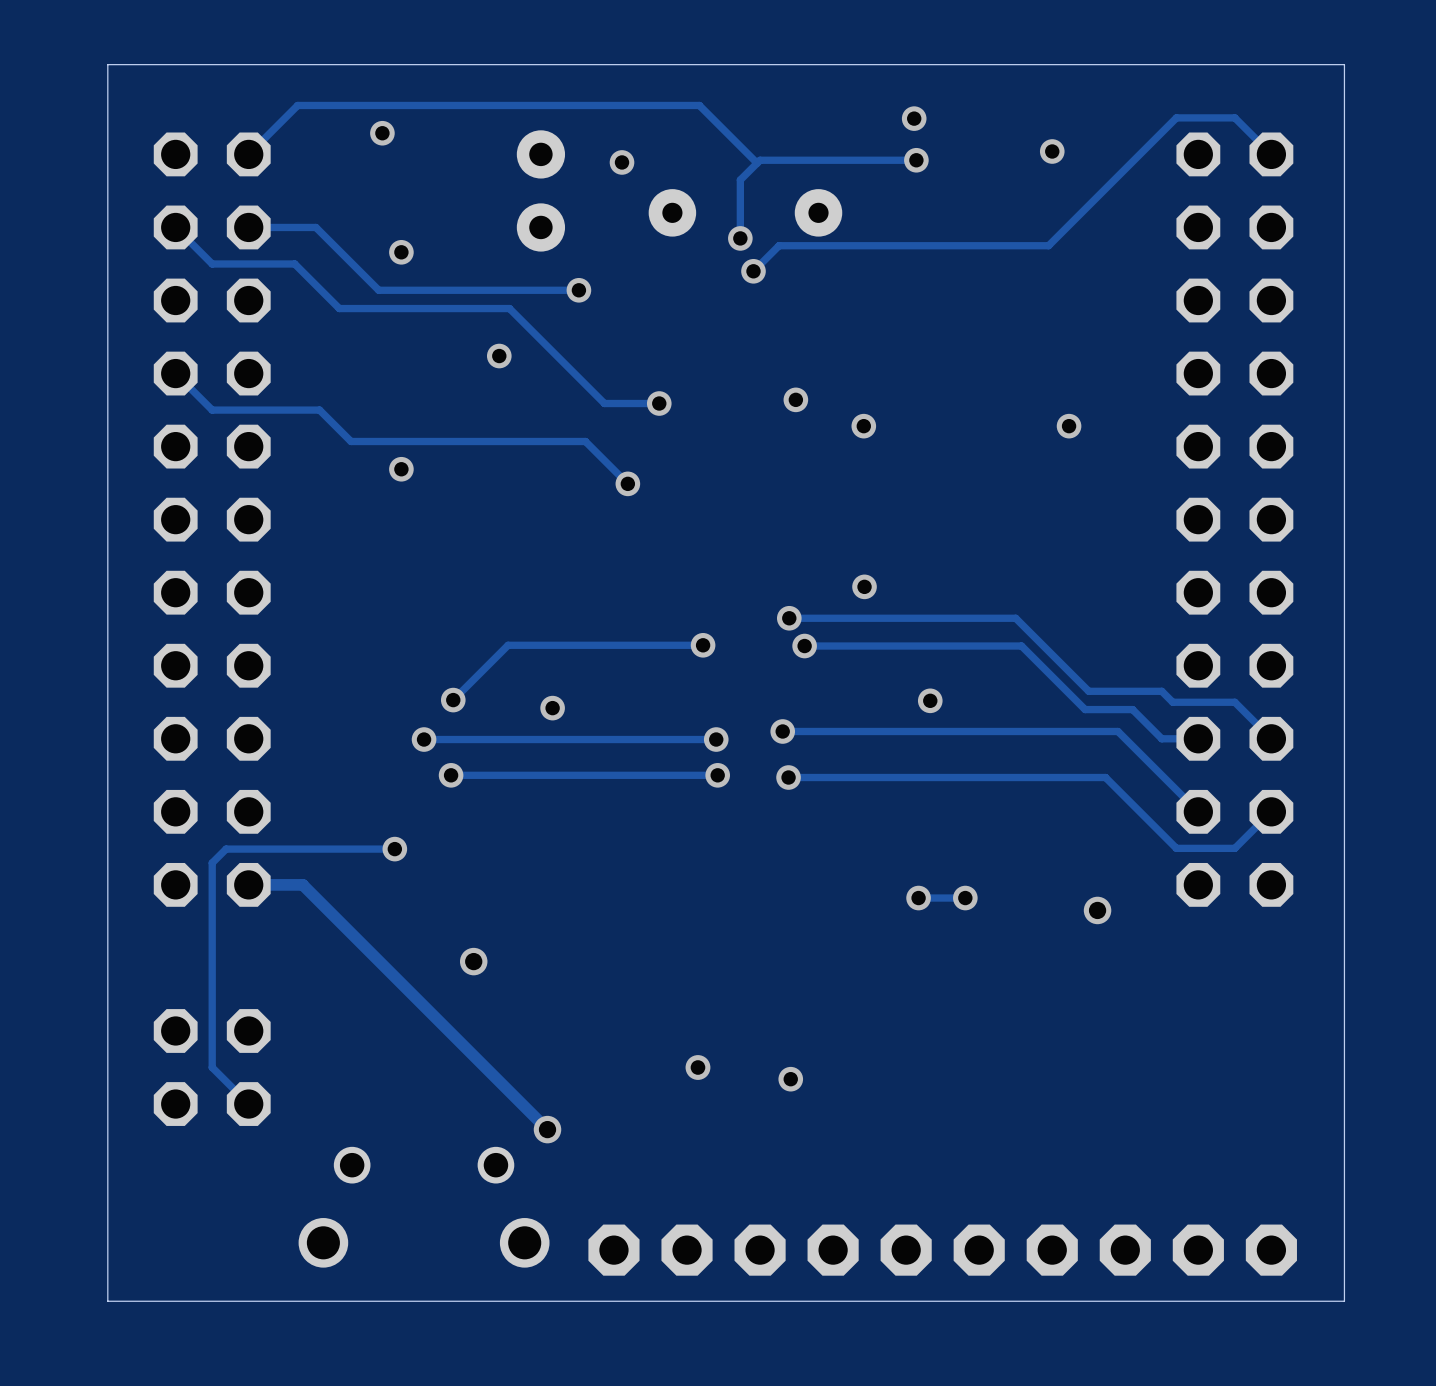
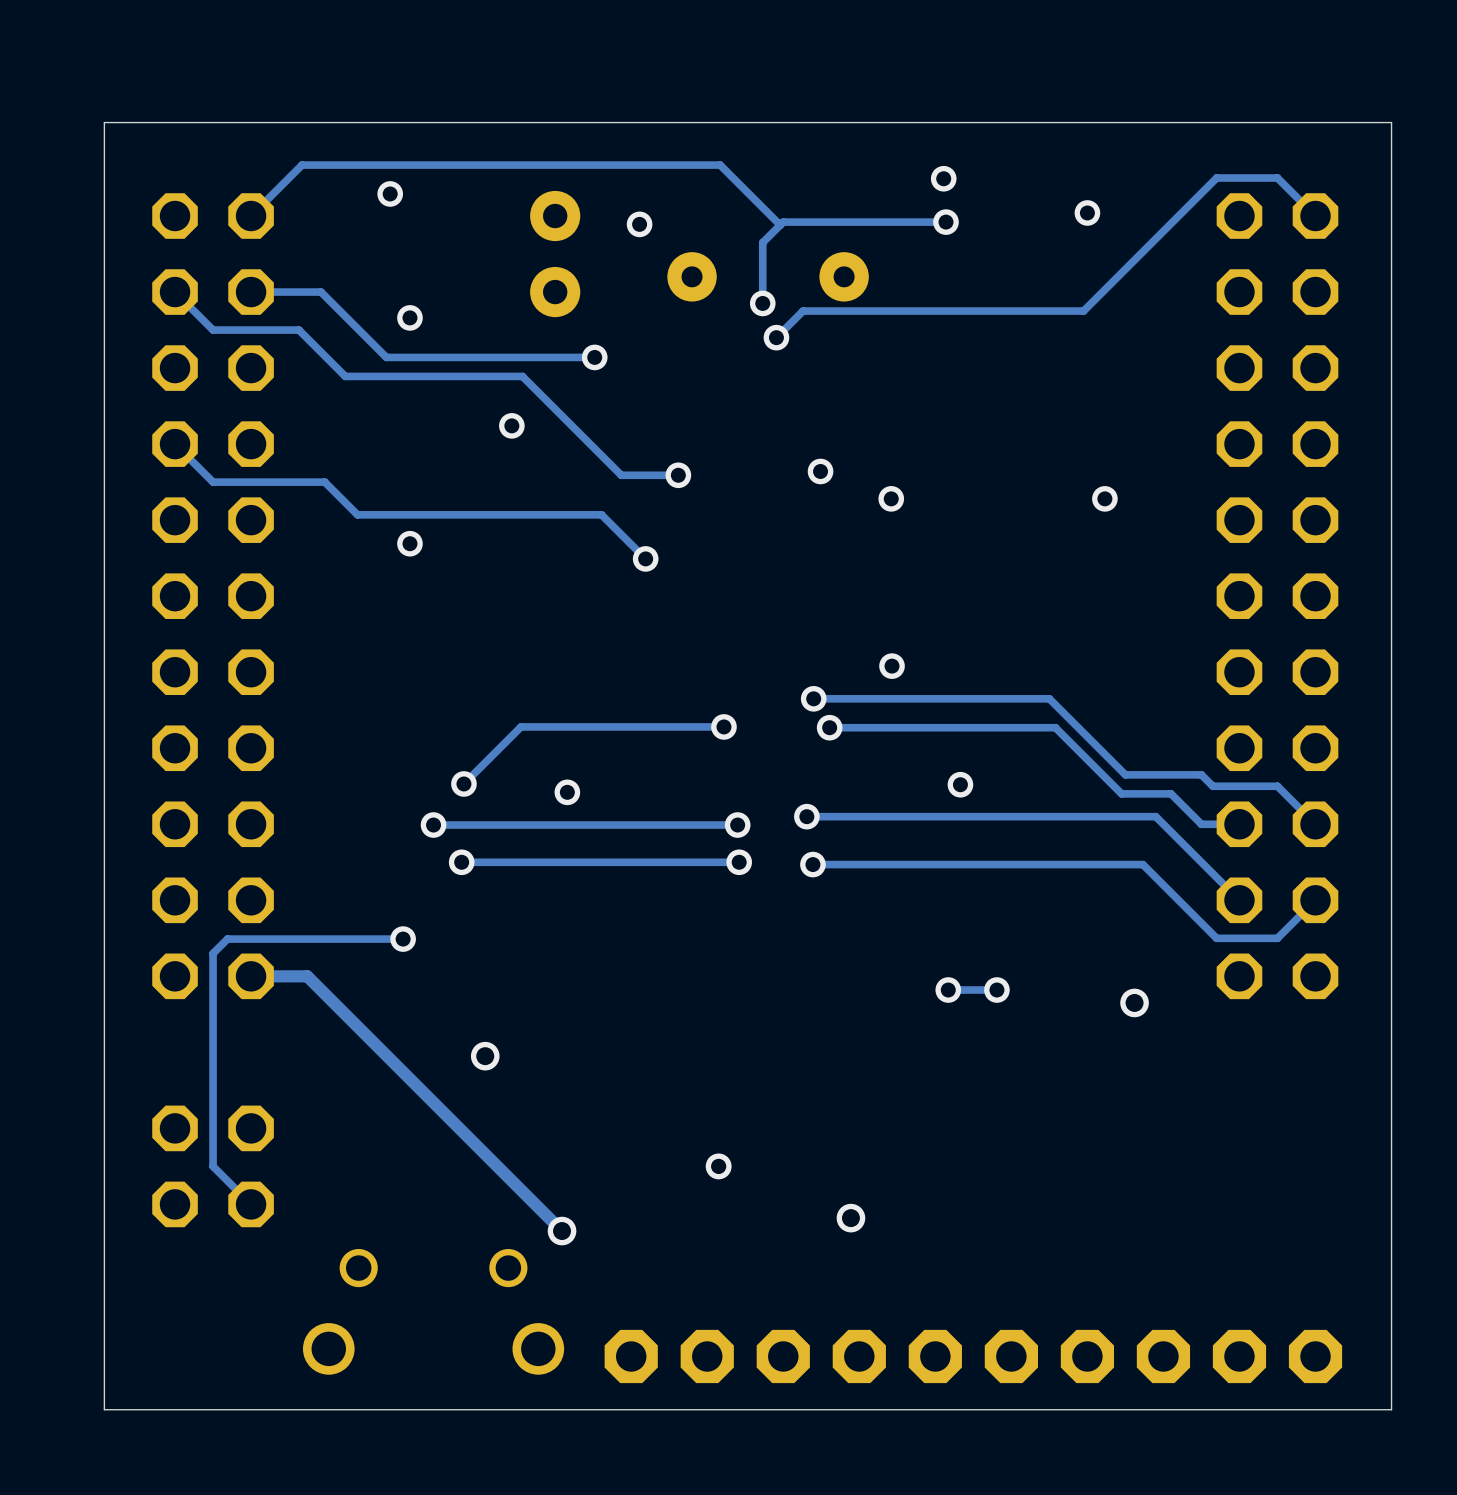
via: (790, 1079) -> none
via: none -> (850, 1218)

